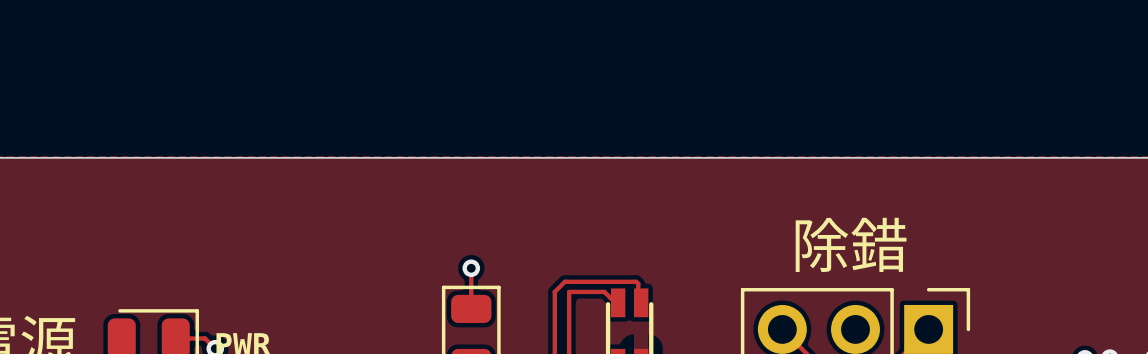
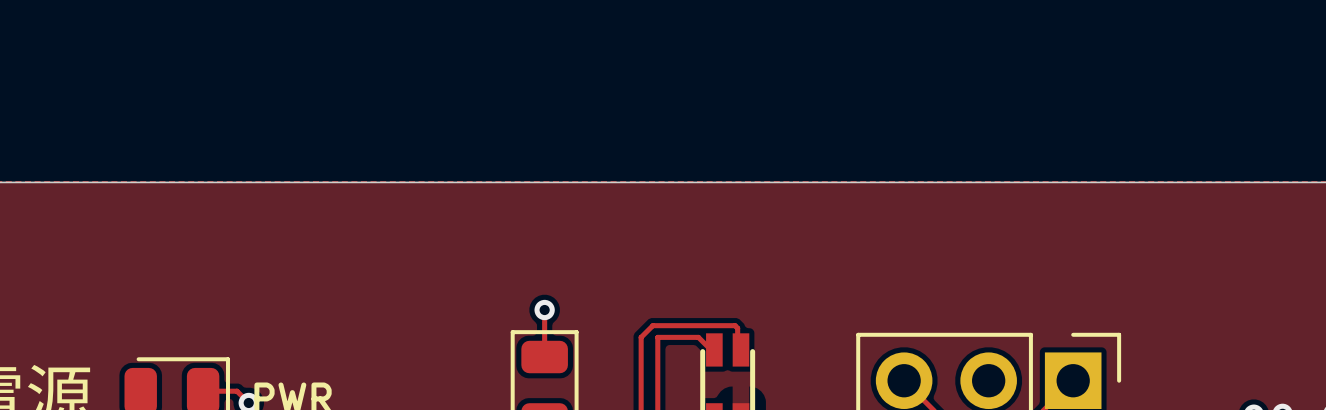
text: 除錯 (851, 244) -> none

